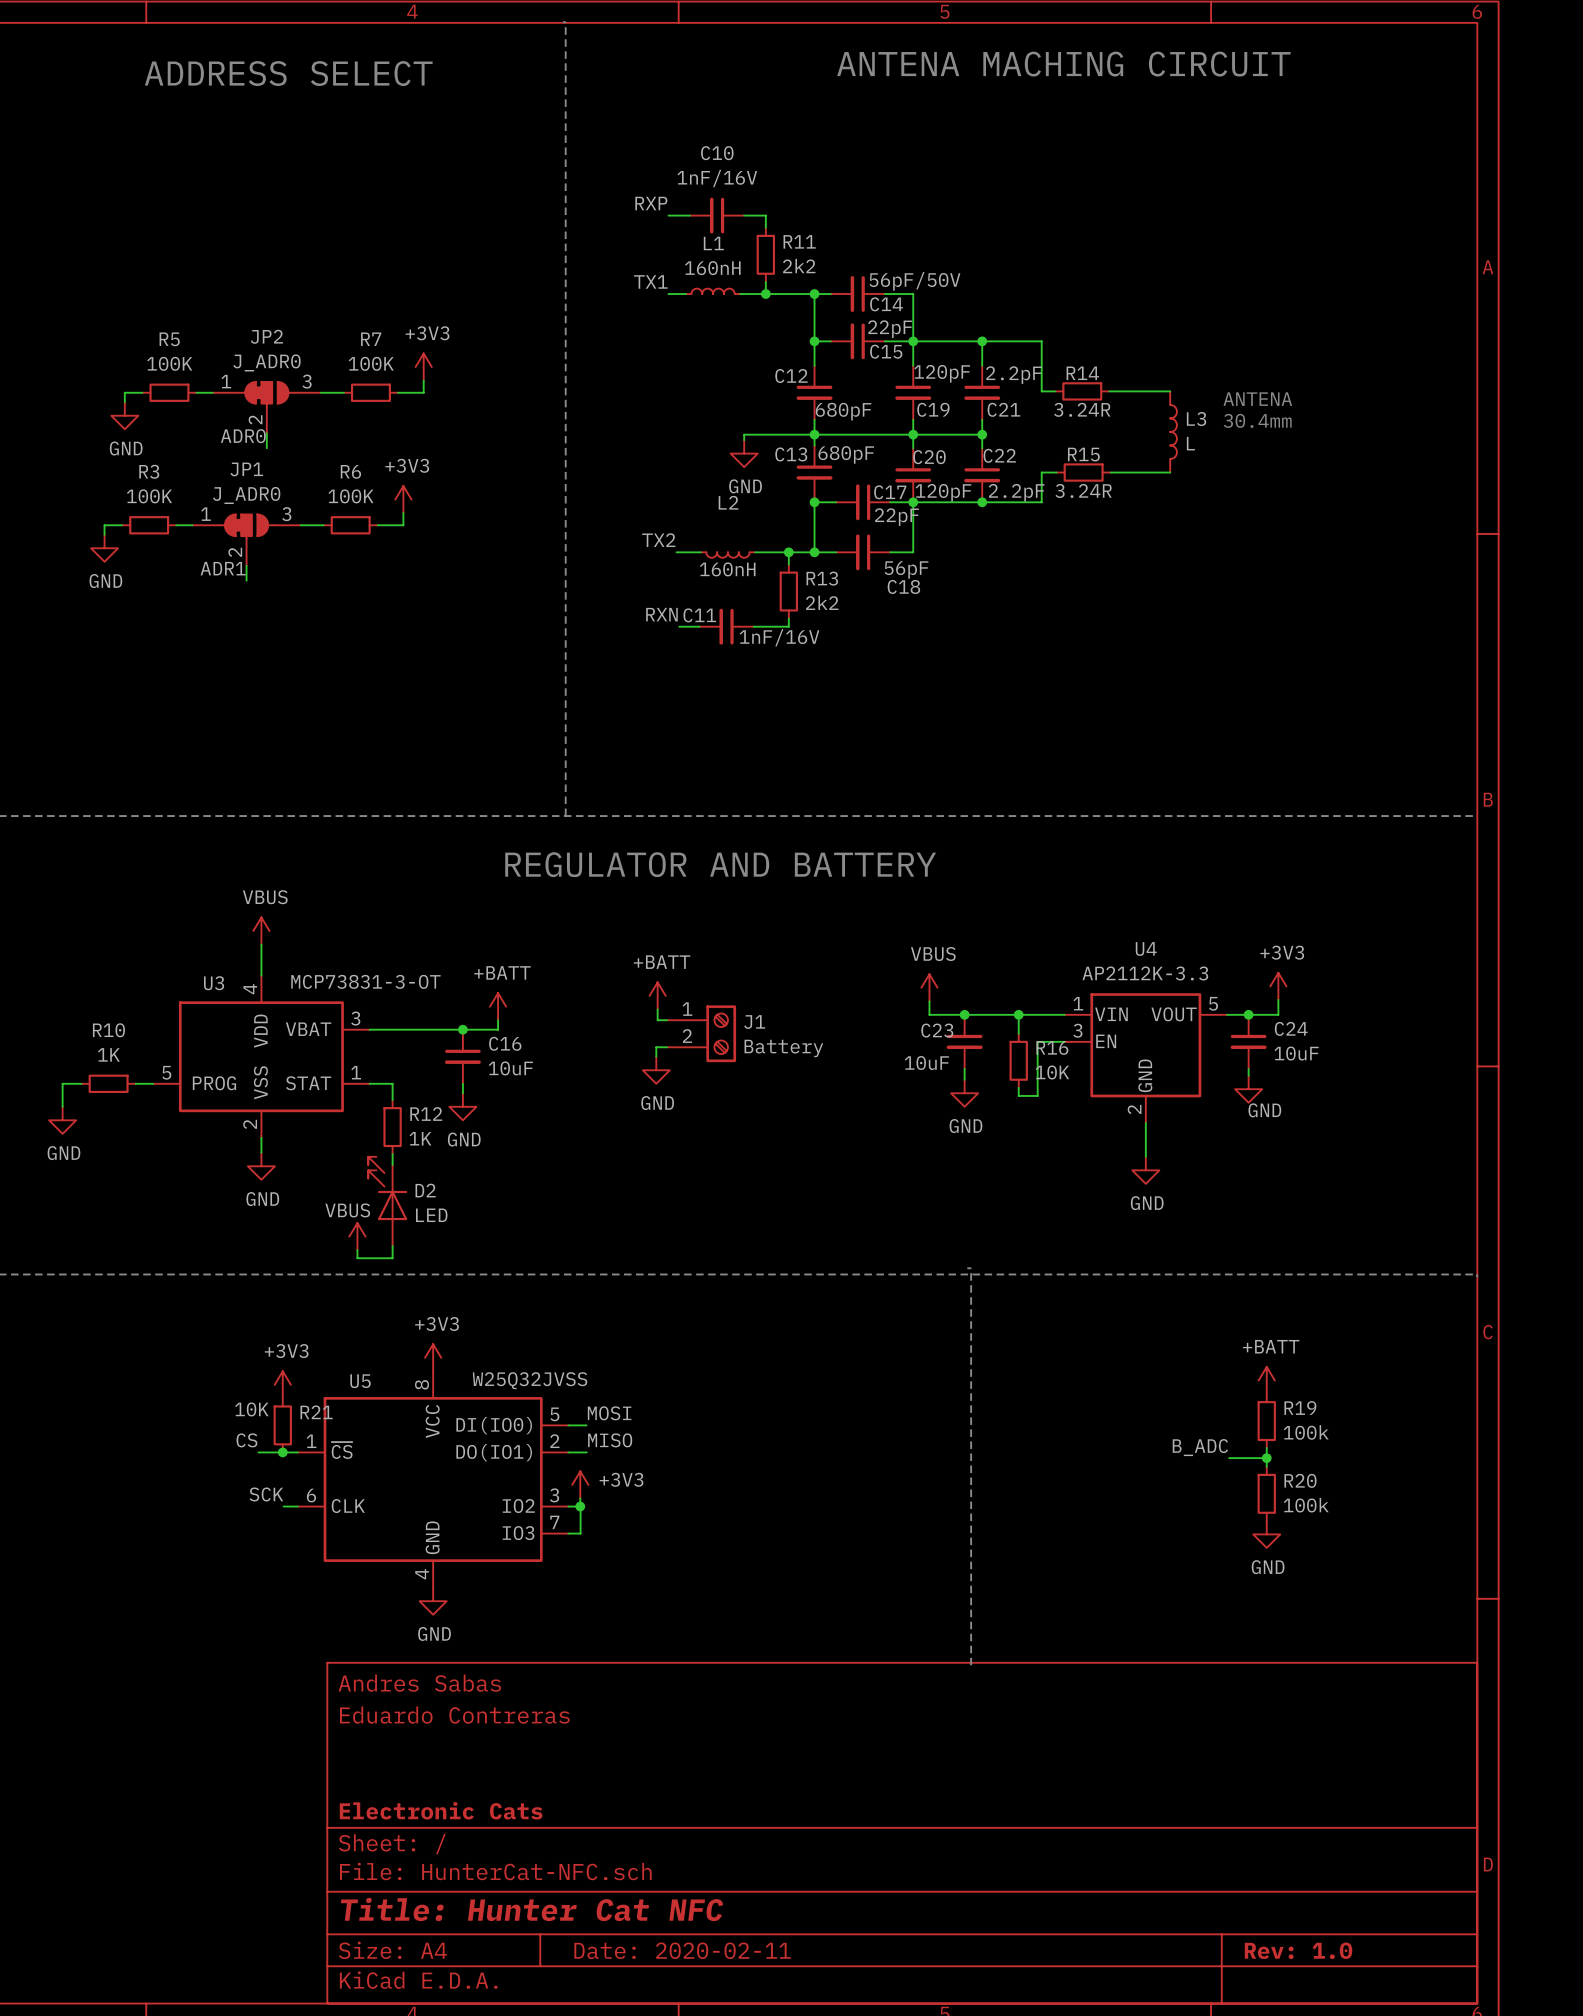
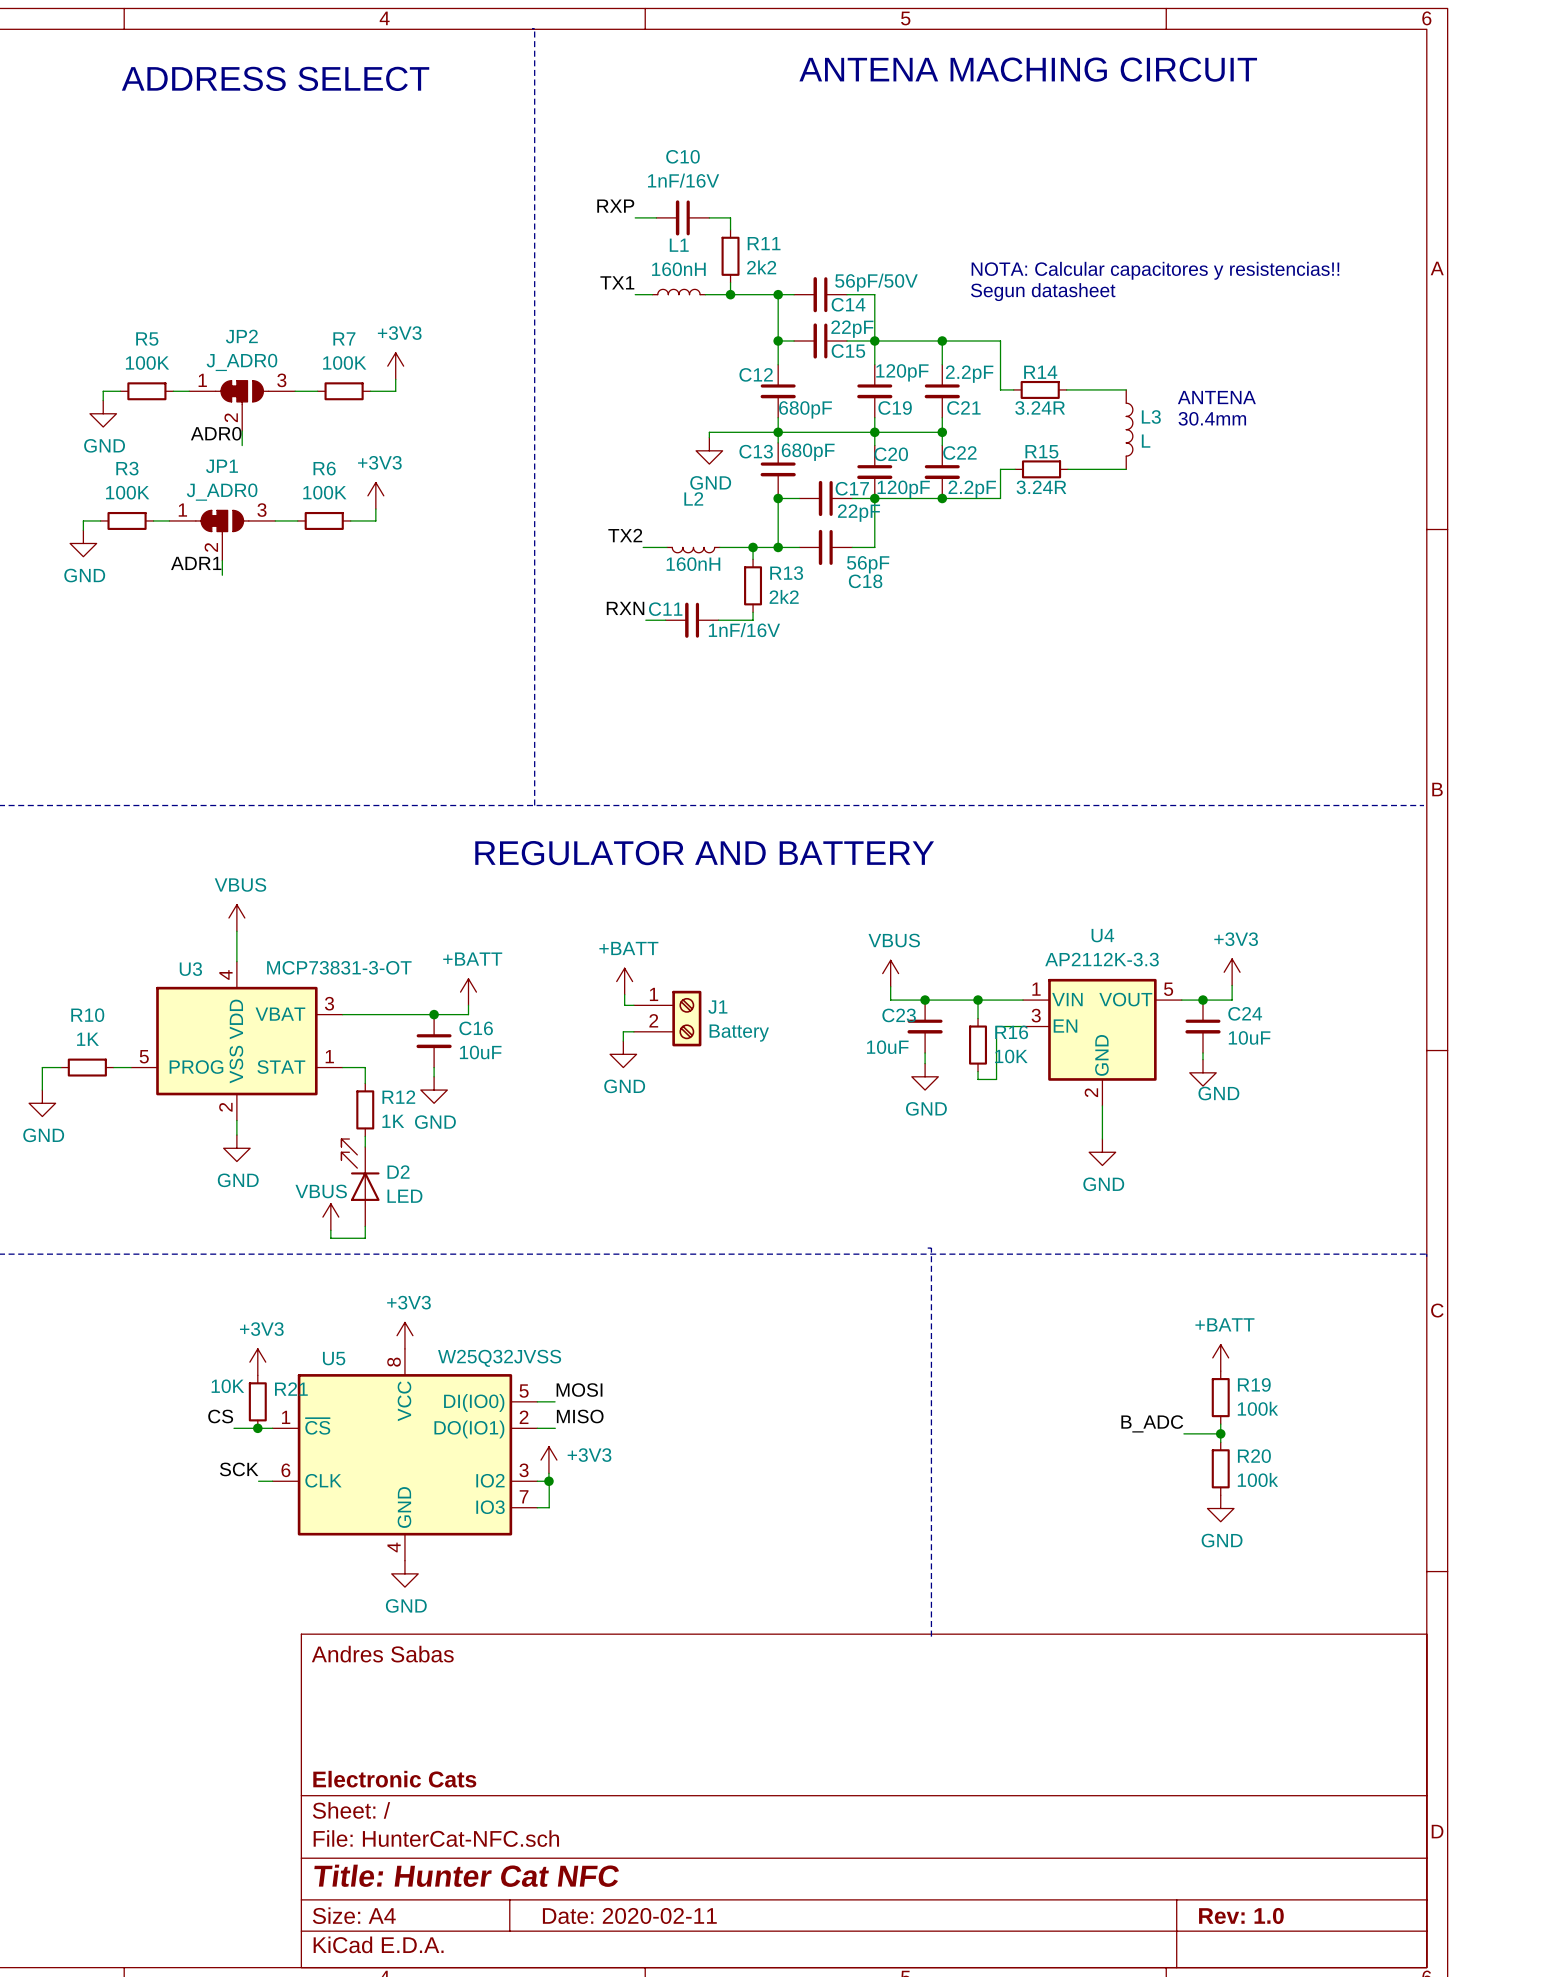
text: none -> NOTA: Calcular capacitores y resistencias!! (1155, 270)
text: none -> Segun datasheet (1043, 292)
title block: Eduardo Contreras (454, 1715) -> none

